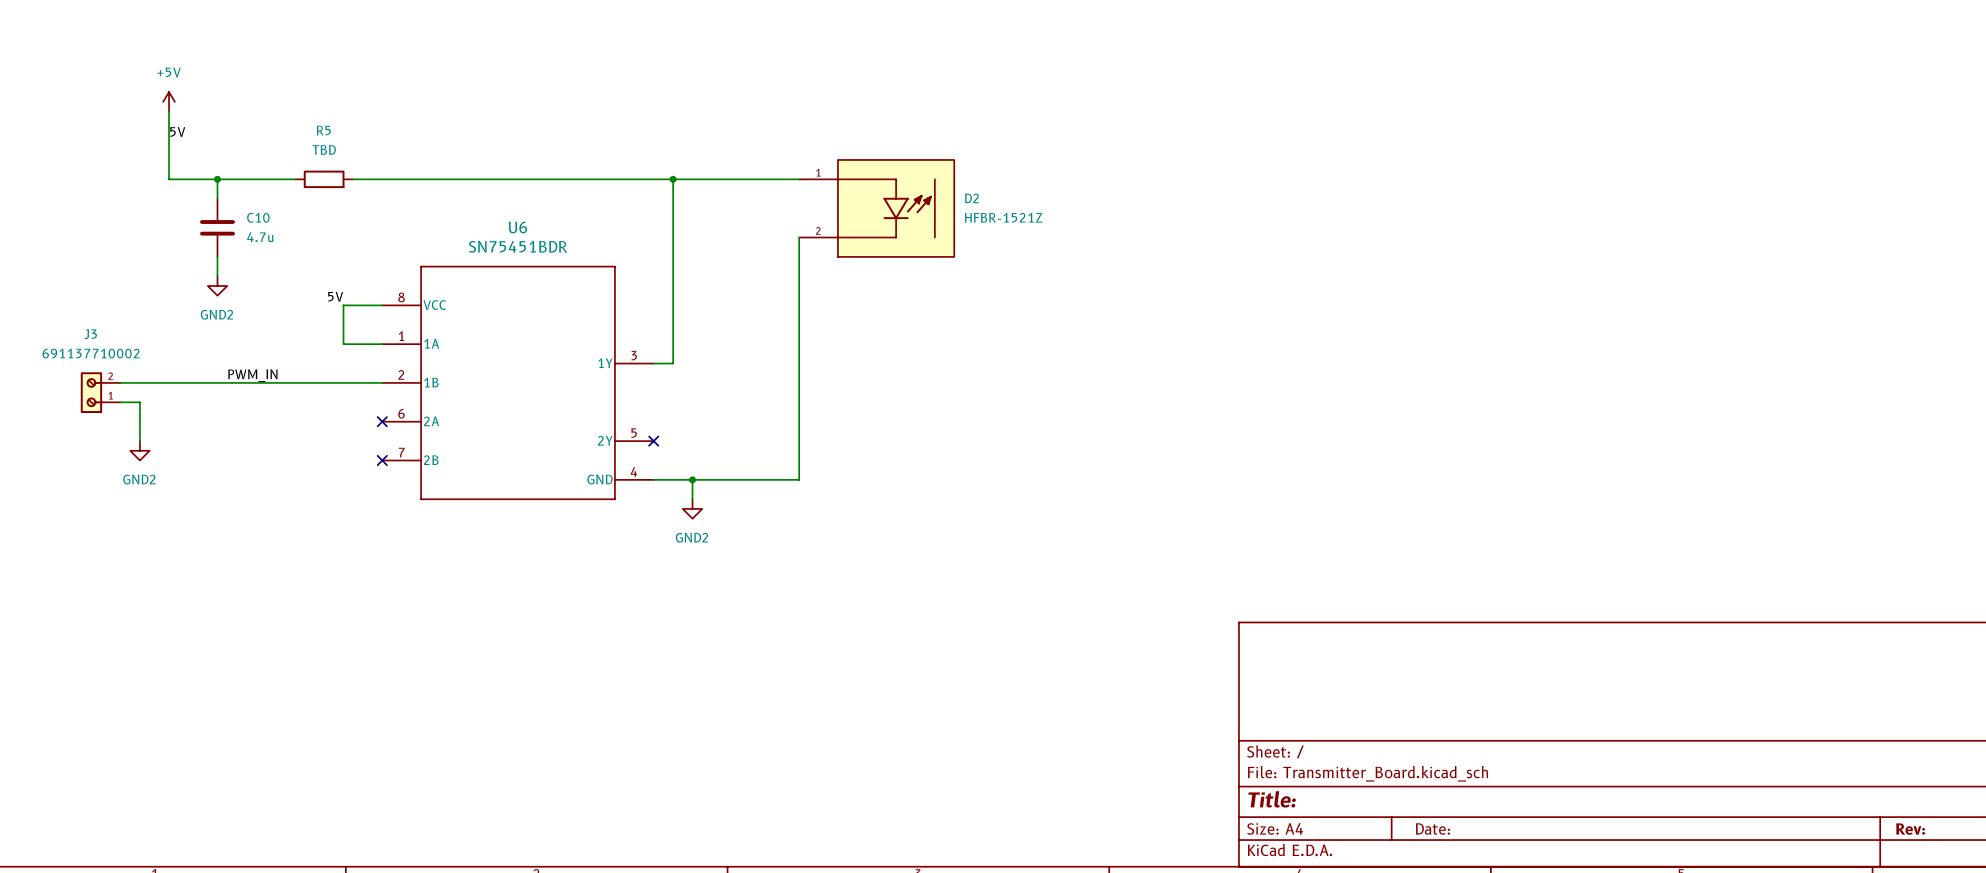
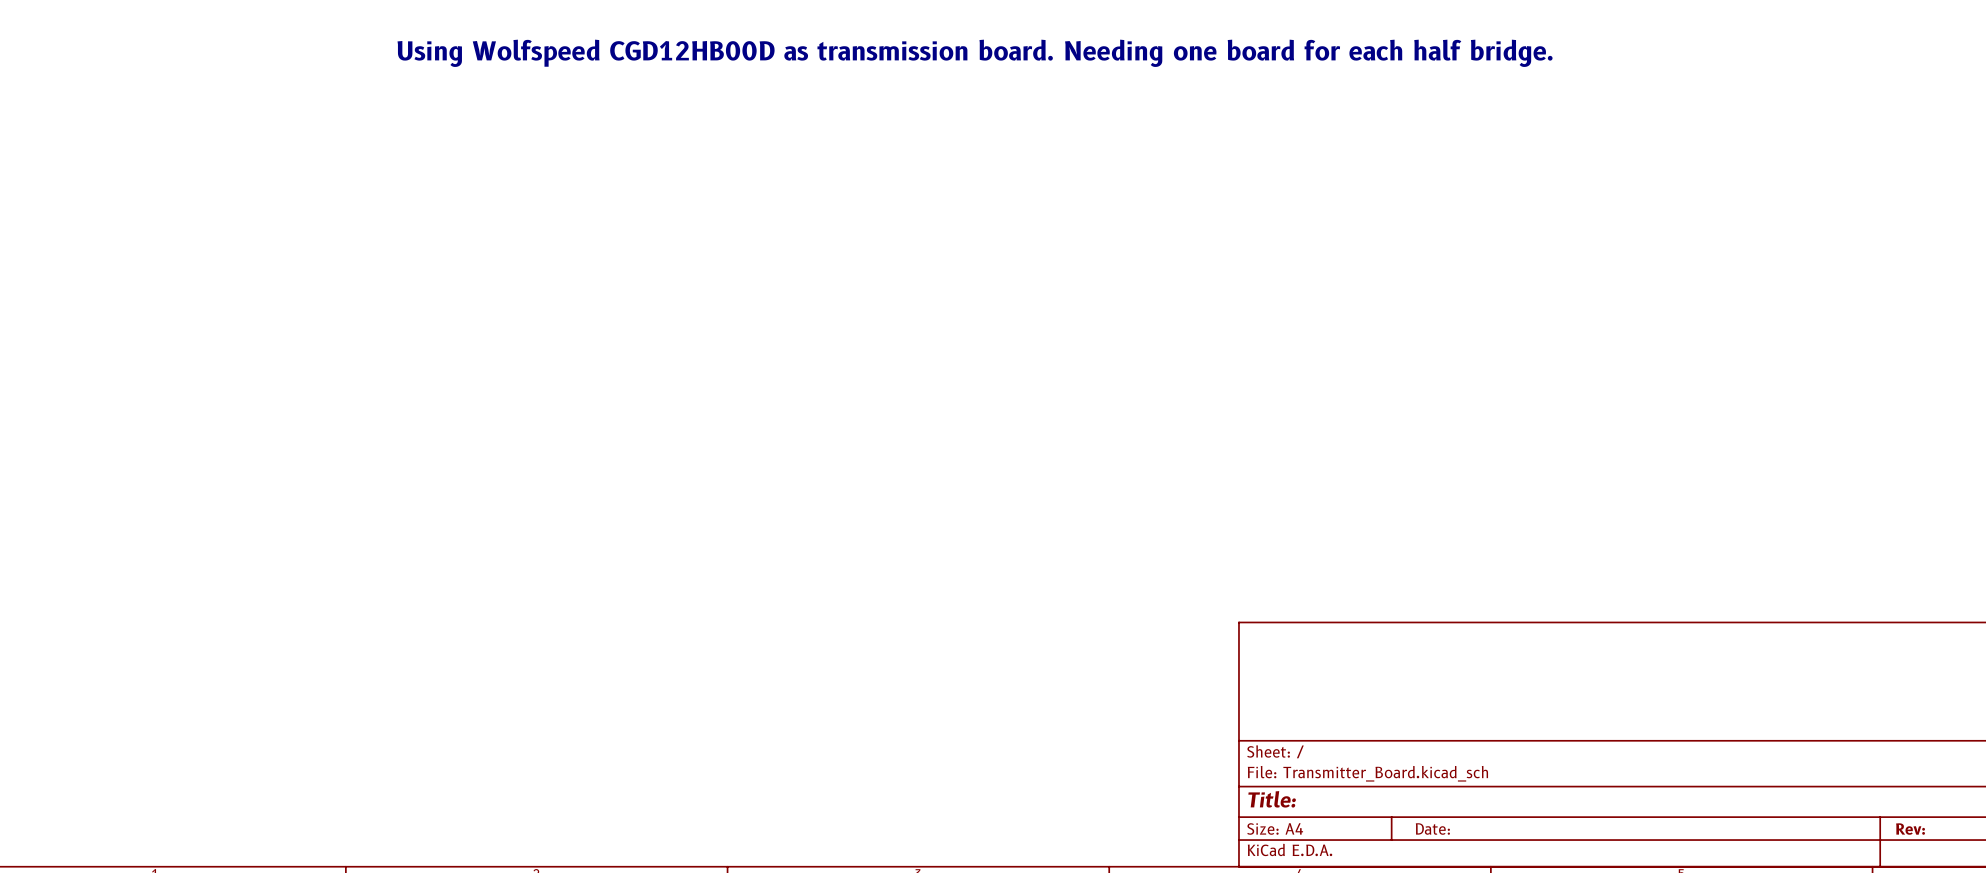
text: none -> Using Wolfspeed CGD12HB00D as transmission board. Needing one board for each half bridge. (975, 53)
power symbol: +5V (169, 101) -> none
wire: (169, 111) (169, 179) (295, 179) -> none
label: 5V (177, 131) -> none
wire: (217, 179) (217, 198) -> none
junction: (217, 179) -> none
R5: TBD (324, 179) -> none
wire: (353, 179) (799, 179) -> none
wire: (673, 179) (673, 363) (653, 363) -> none
junction: (673, 179) -> none
D2: HFBR-1521Z (876, 208) -> none
C10: 4.7u (217, 227) -> none
wire: (799, 237) (799, 479) (653, 479) -> none
wire: (217, 256) (217, 276) -> none
power symbol: GND2 (217, 285) -> none
label: 5V (335, 296) -> none
wire: (382, 305) (343, 305) (343, 344) (382, 344) -> none
label: PWM_IN (252, 375) -> none
wire: (120, 382) (382, 382) -> none
U6: SN75451BDR (518, 382) -> none
J3: 691137710002 (100, 392) -> none
wire: (120, 402) (139, 402) (139, 441) -> none
no-connect mark: (382, 421) -> none
no-connect mark: (653, 441) -> none
power symbol: GND2 (139, 450) -> none
no-connect mark: (382, 460) -> none
wire: (692, 479) (692, 499) -> none
junction: (692, 479) -> none
power symbol: GND2 (692, 508) -> none

